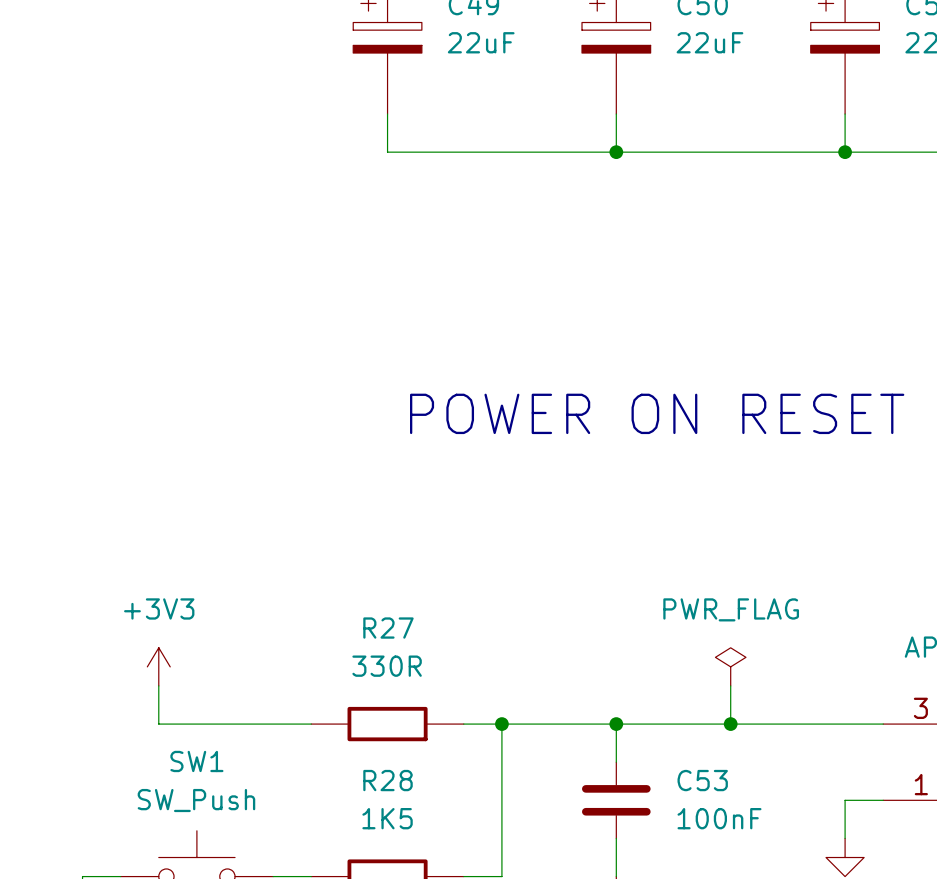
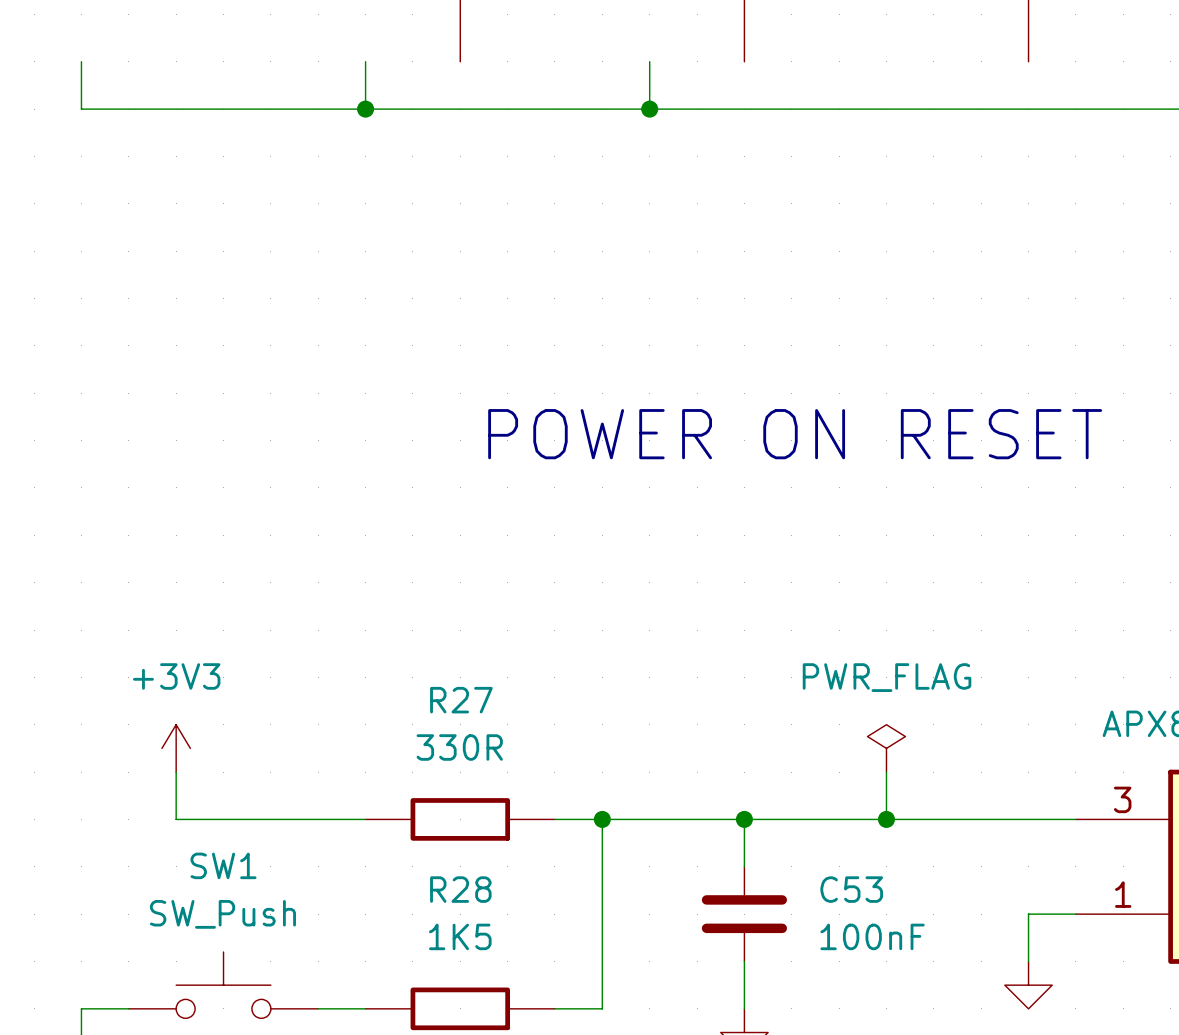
wire: none -> (365, 61) (365, 109)
wire: (387, 114) (387, 152) -> (81, 61) (81, 109) (460, 109)
wire: (616, 114) (616, 152) -> (649, 61) (649, 109)
wire: (845, 114) (845, 152) -> none
junction: none -> (365, 109)
junction position: (616, 152) -> (649, 109)
junction: (845, 152) -> none

